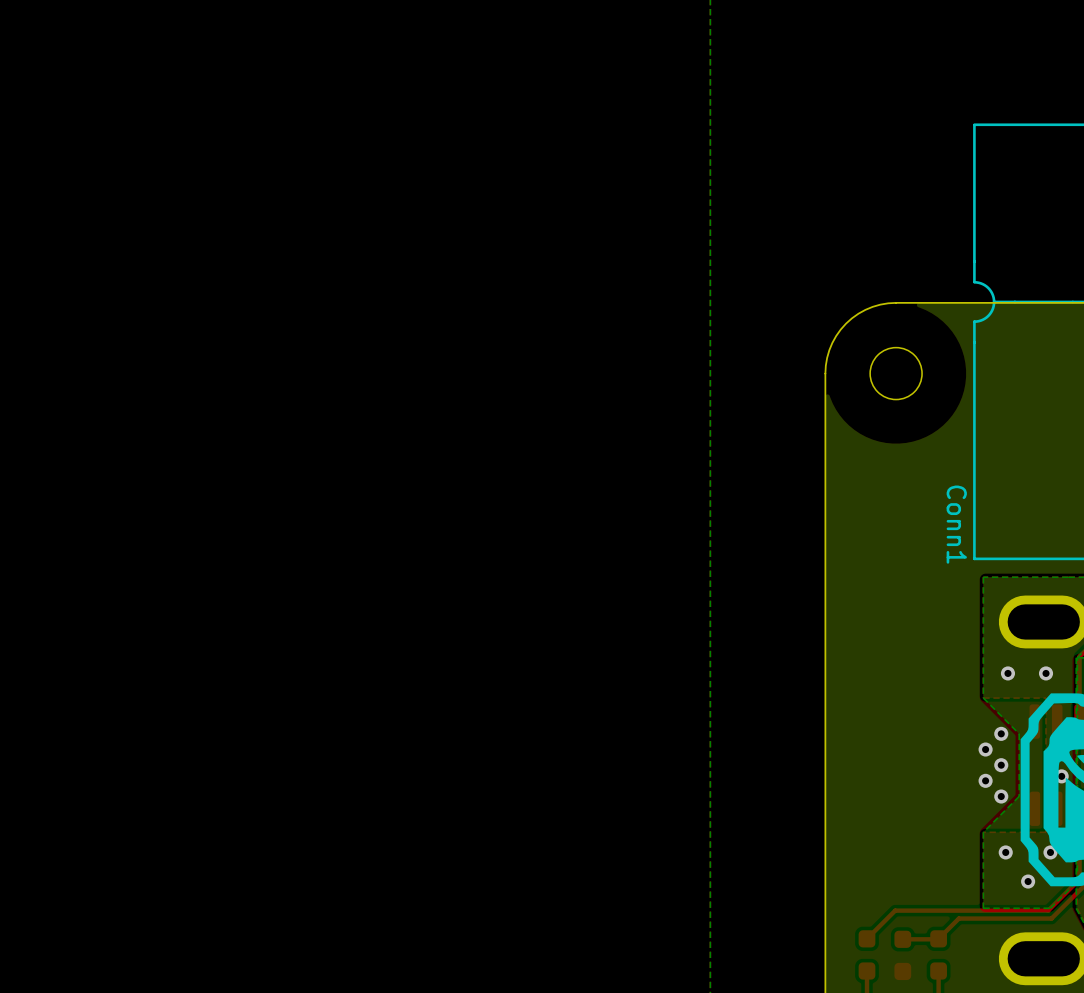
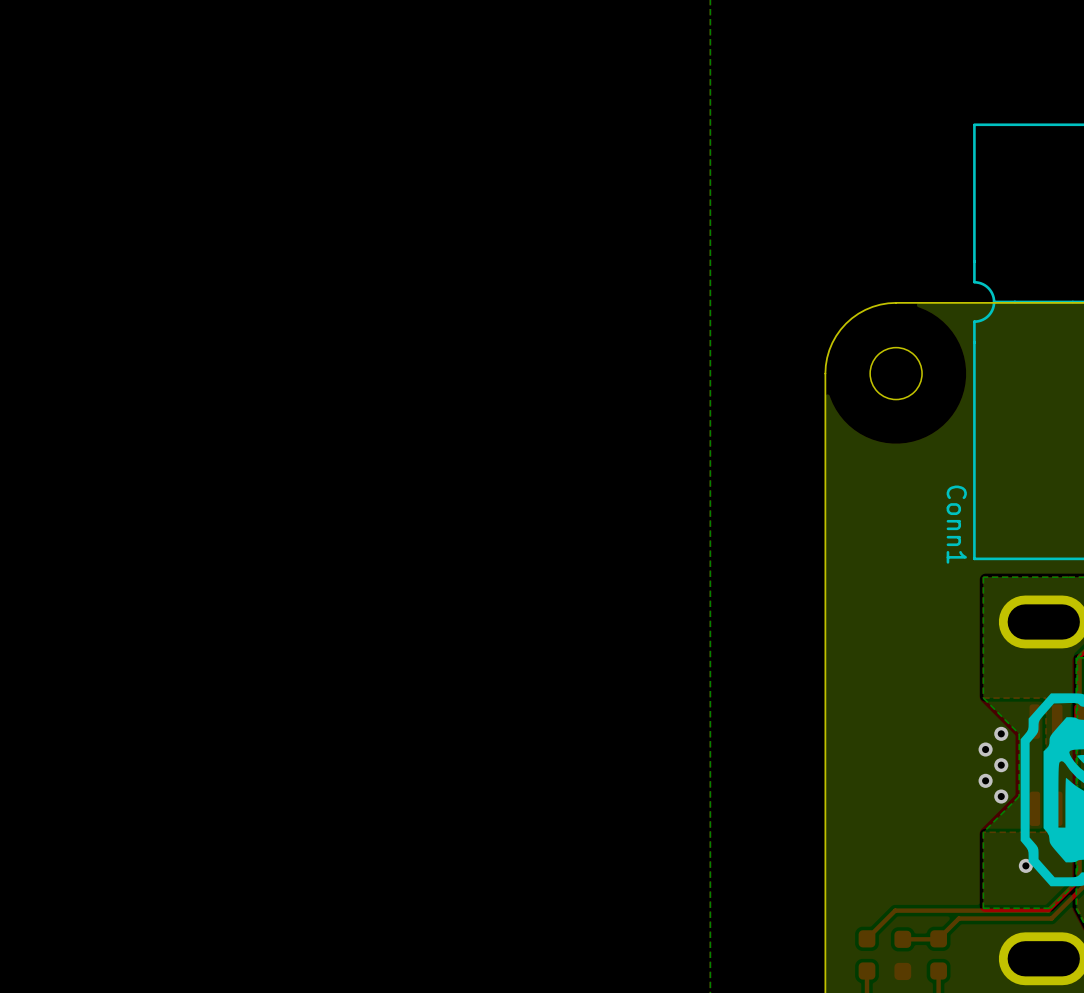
via: (1007, 673) -> none
via: (1046, 673) -> none
via: (1061, 776) -> none
via: (1005, 852) -> none
via: (1050, 852) -> none
via: none -> (1025, 865)
via: (1028, 881) -> none

